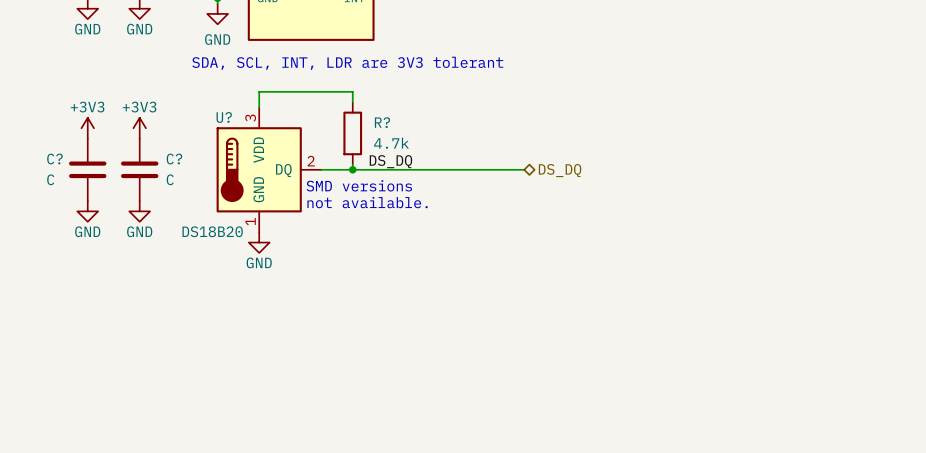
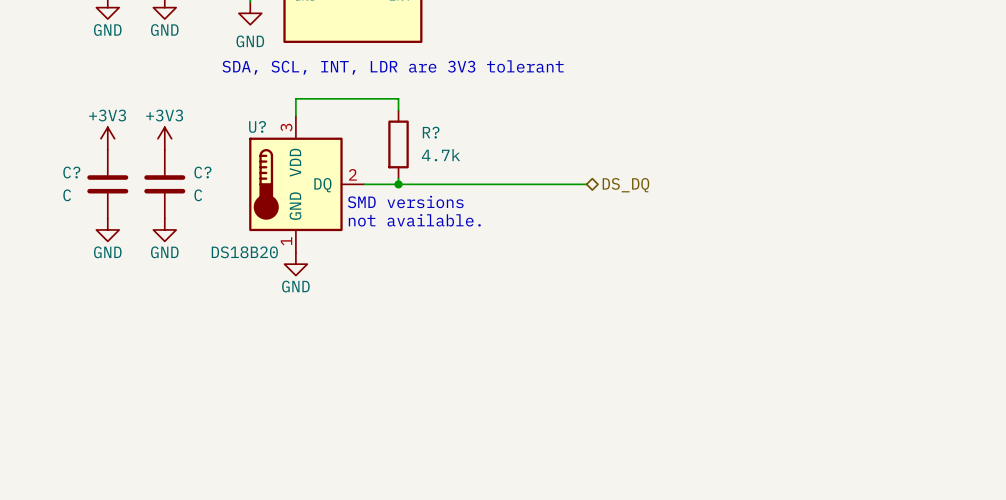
label: DS_DQ (390, 161) -> none

